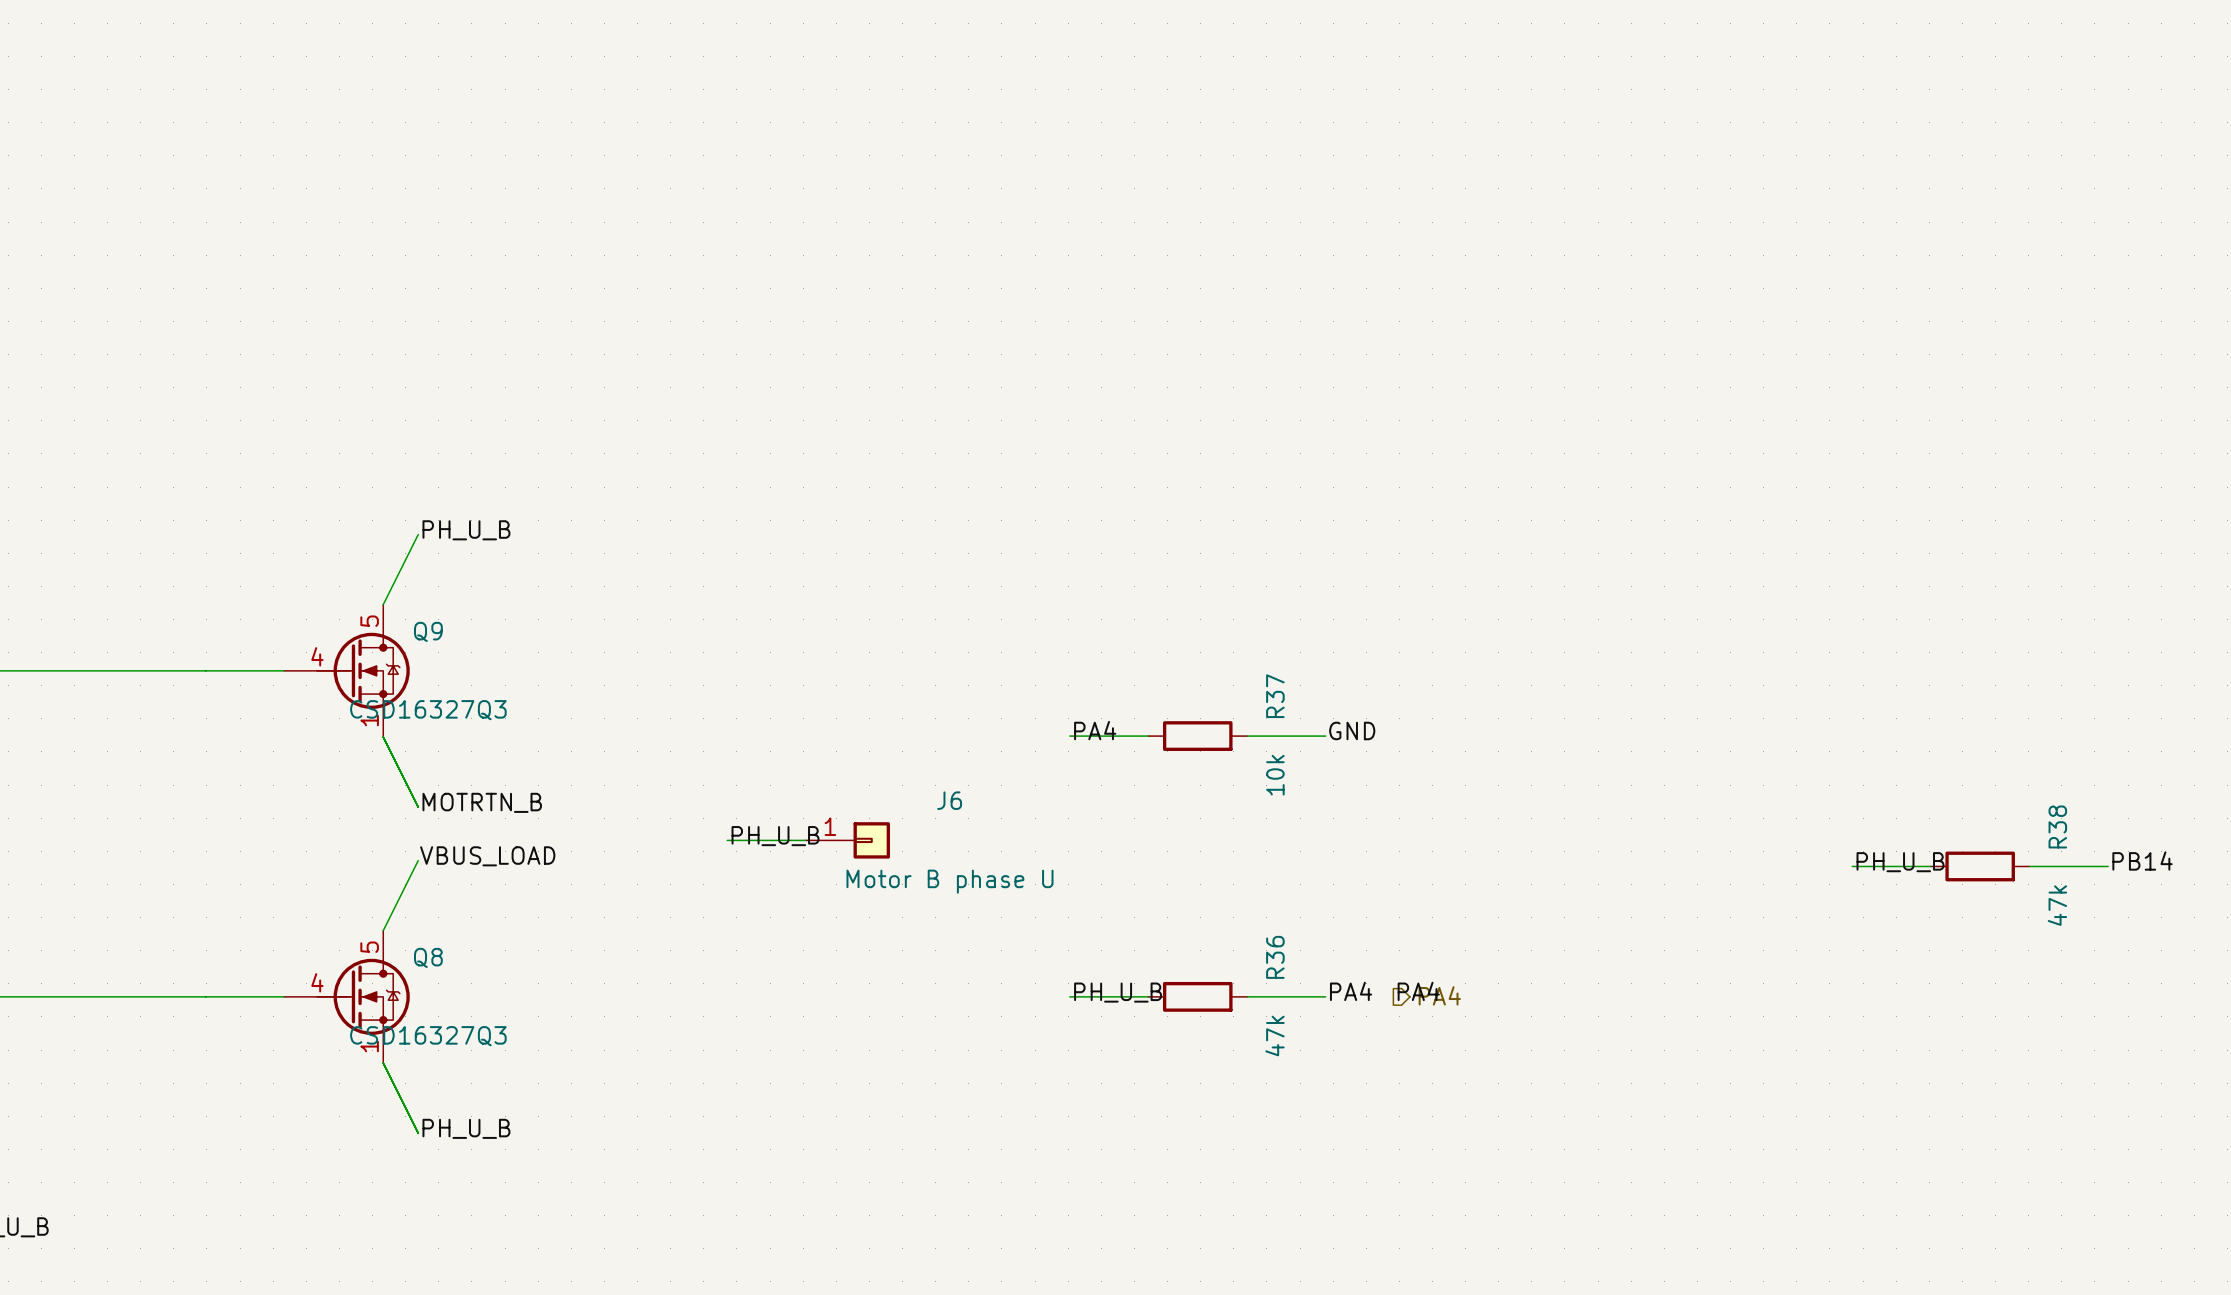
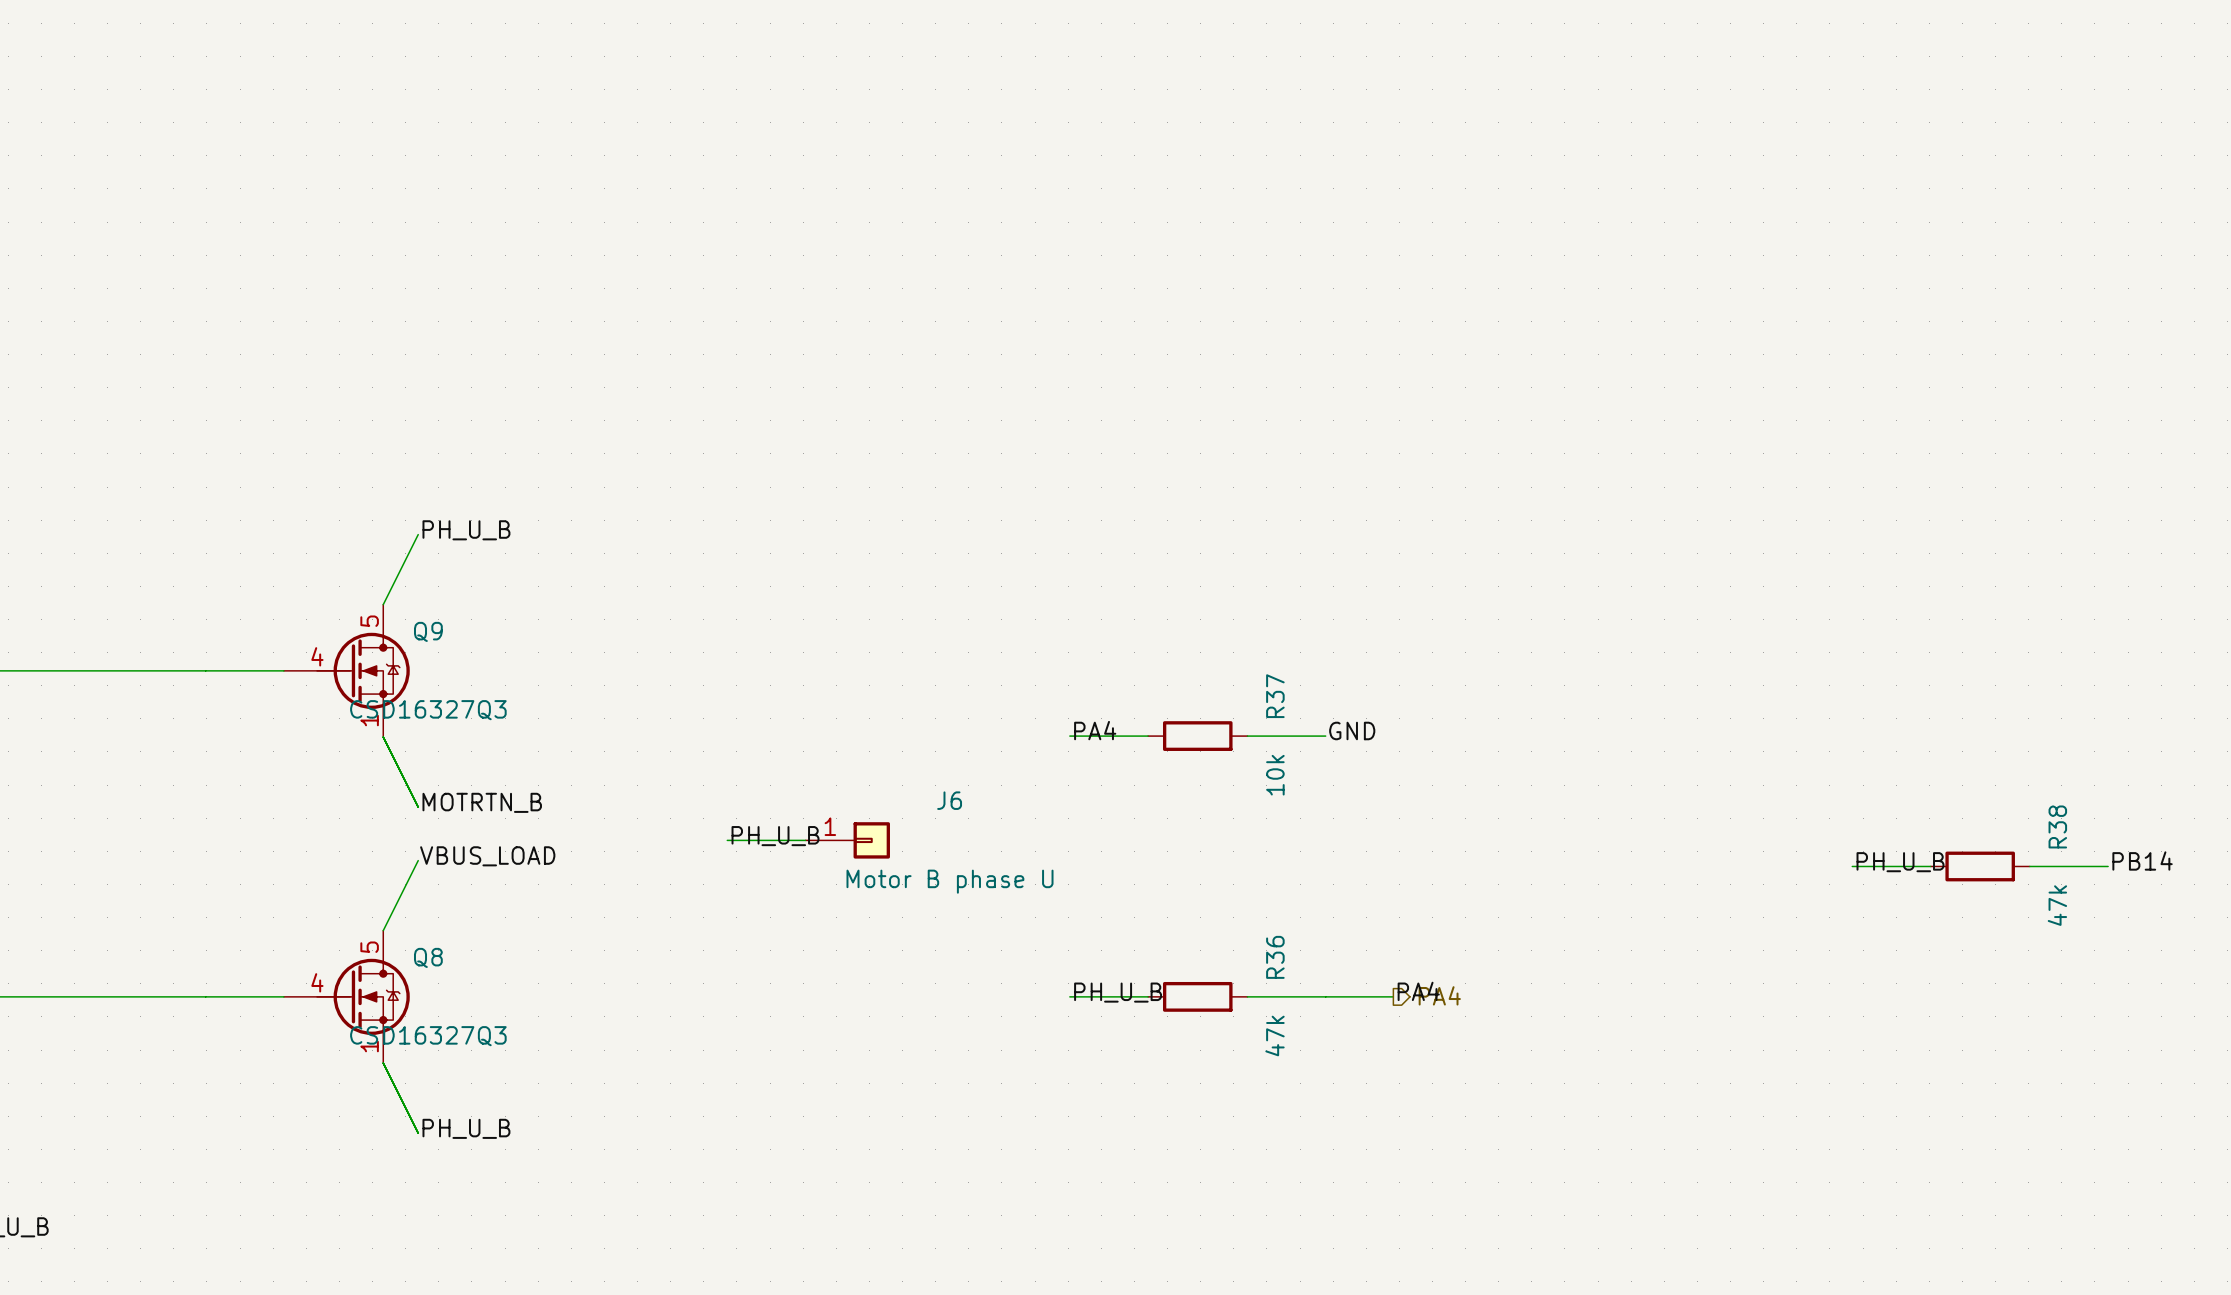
label: PA4 (1351, 991) -> none
wire: none -> (1325, 996) (1393, 996)

